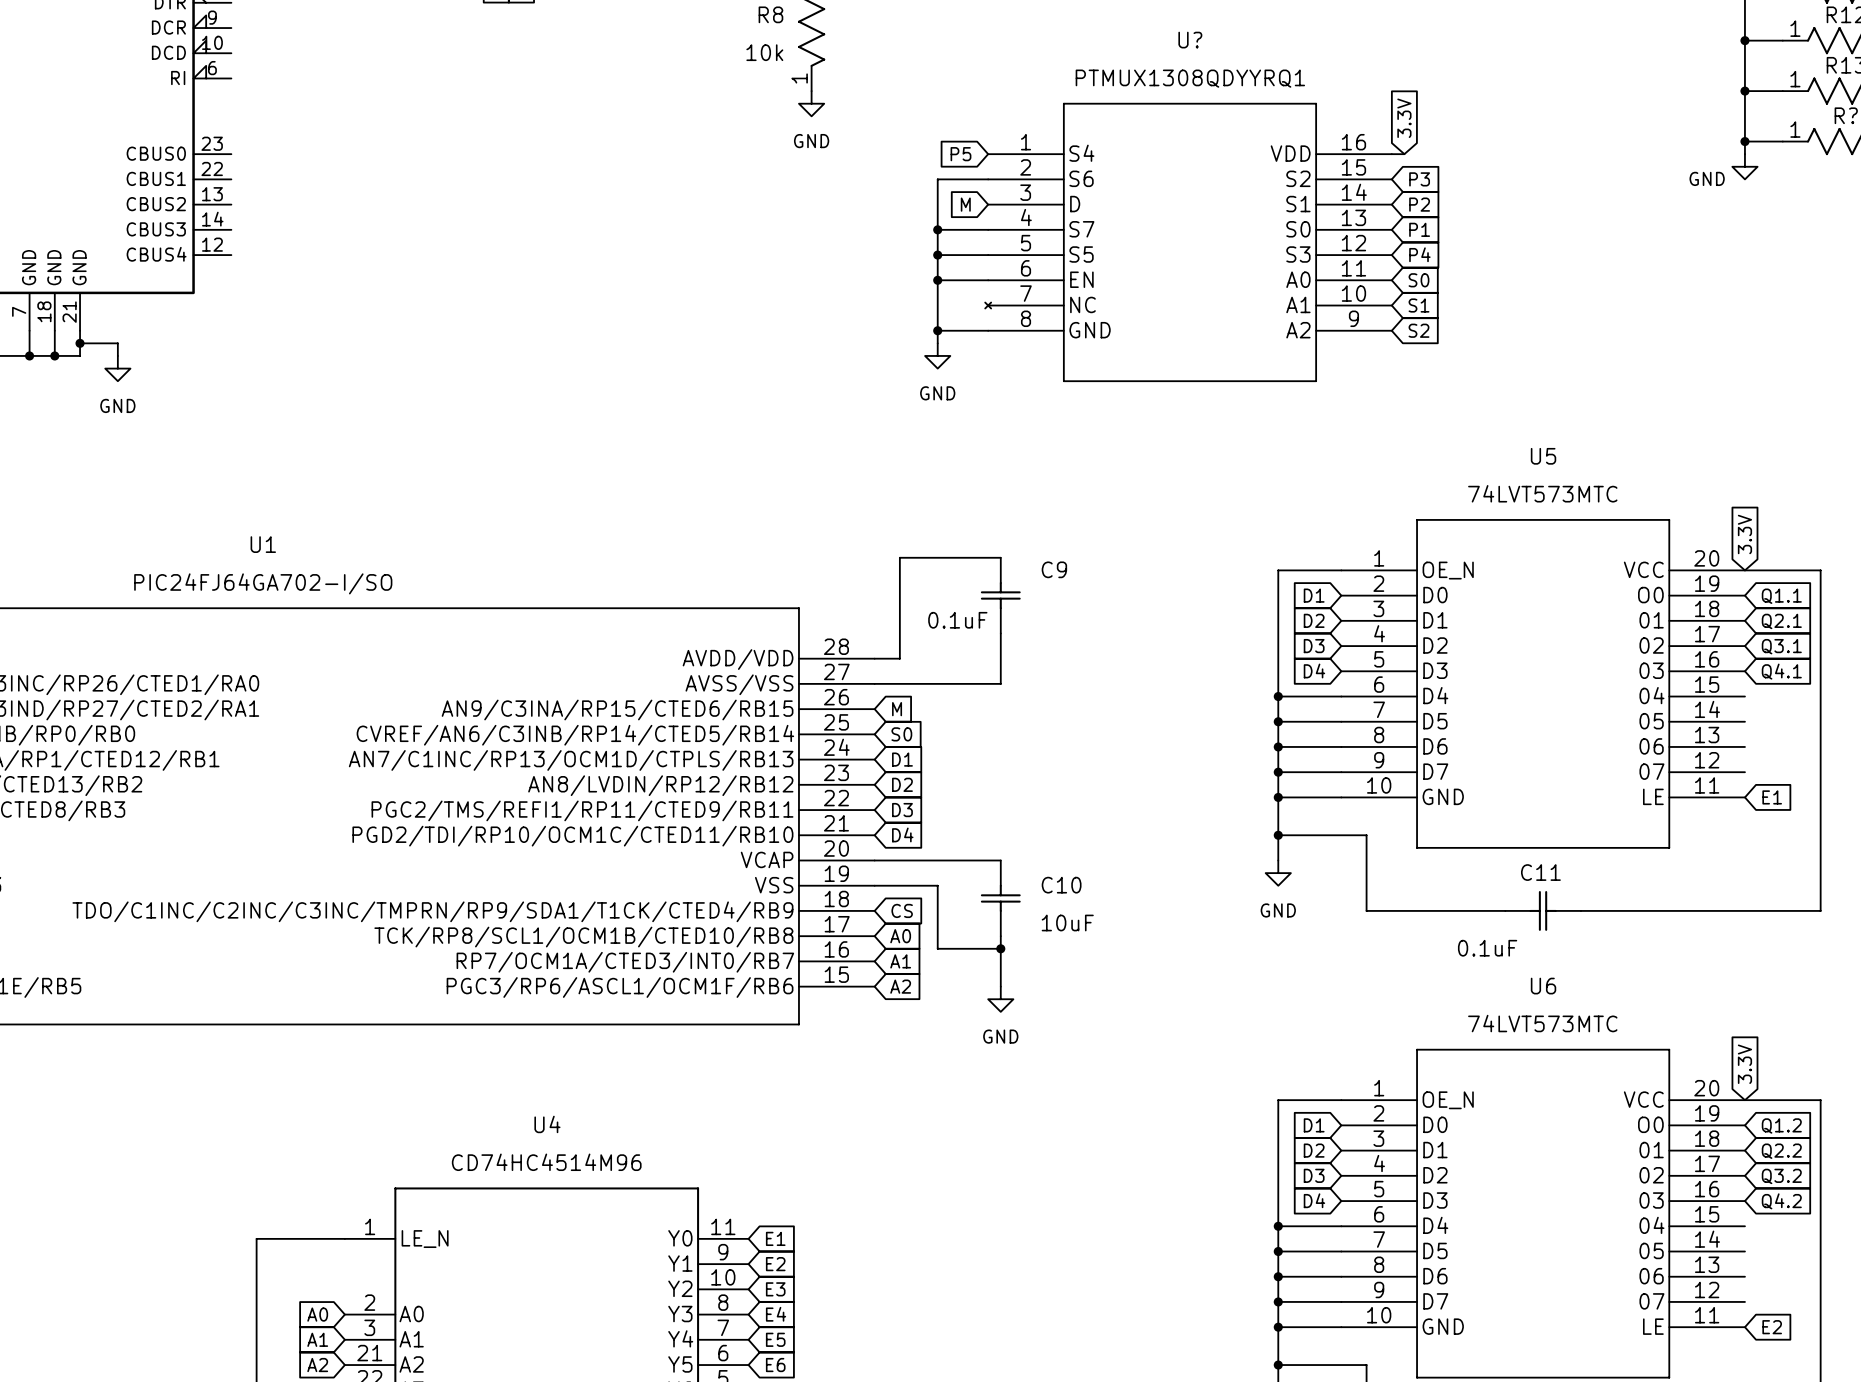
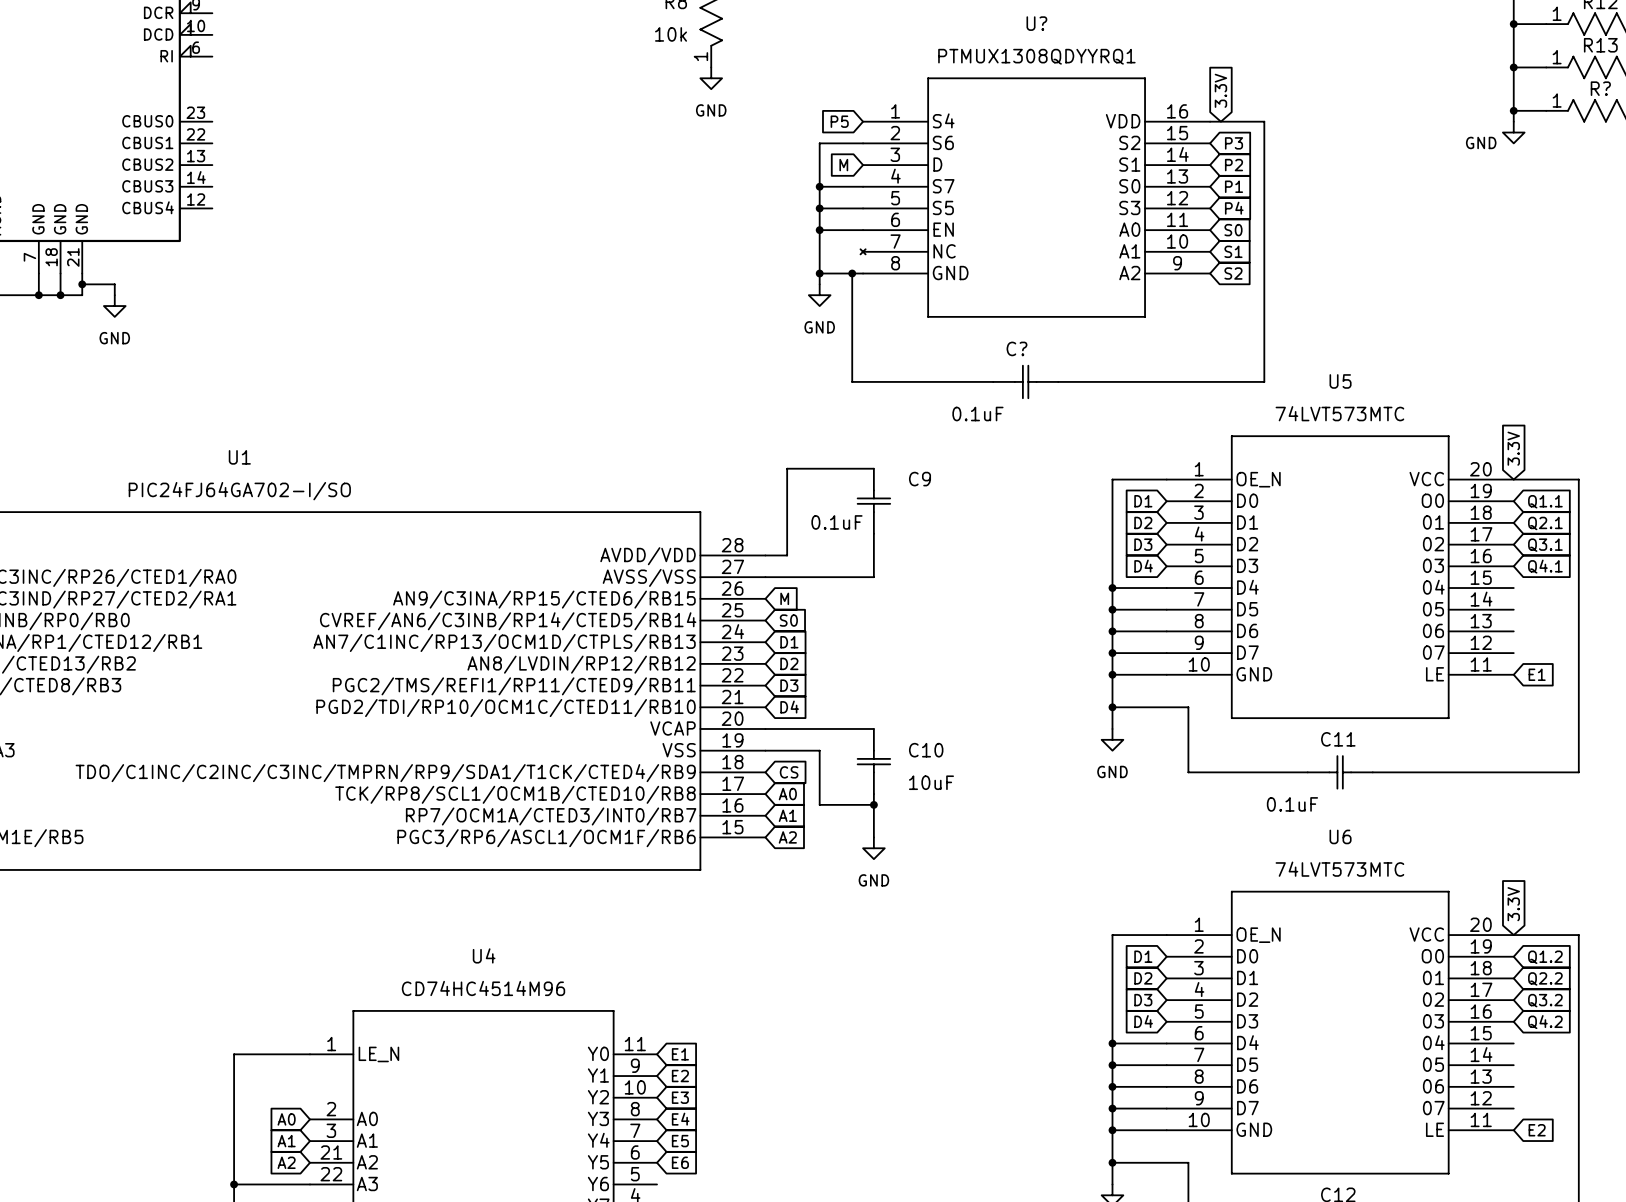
wire: none -> (1220, 121) (1264, 121) (1264, 381) (1058, 381)
wire: none -> (852, 273) (852, 381) (993, 381)
junction: none -> (852, 273)
C?: none -> 0.1uF (1025, 381)

